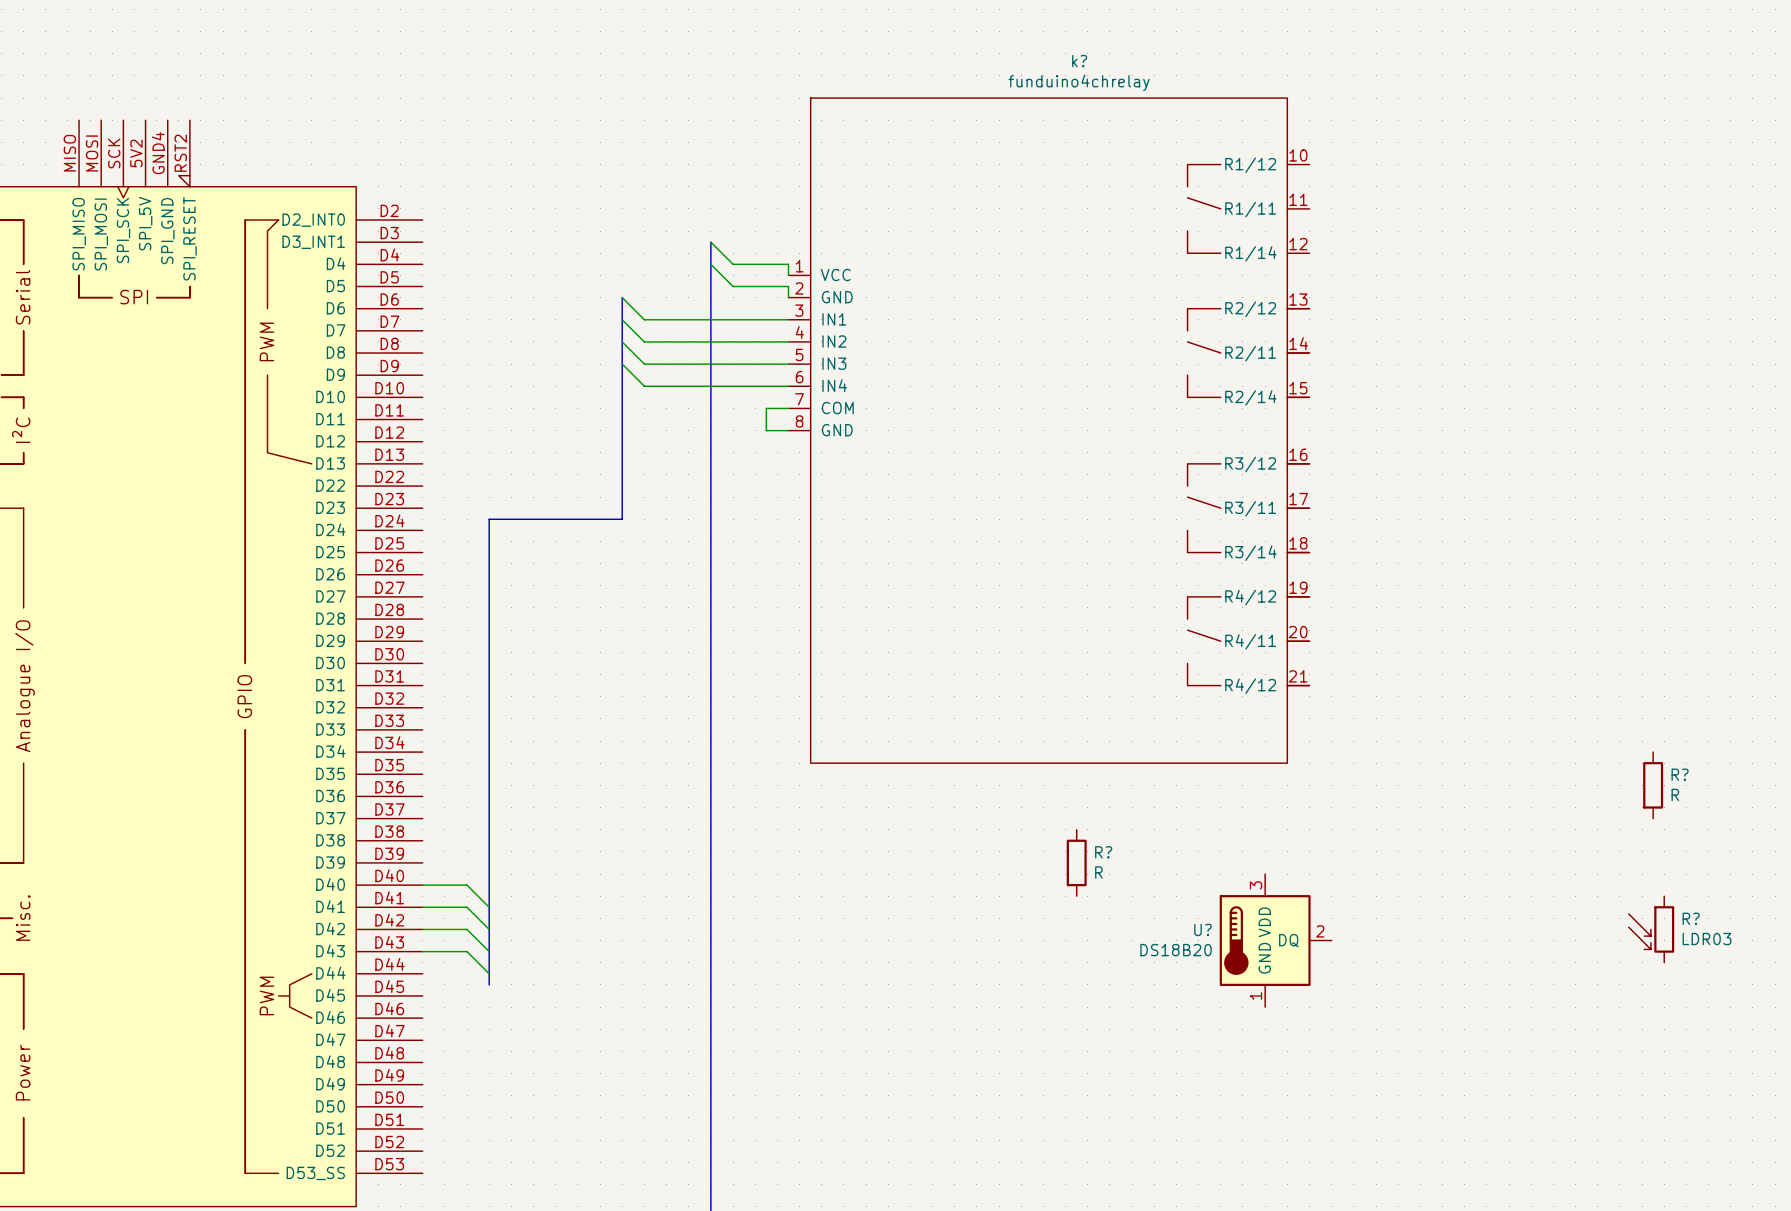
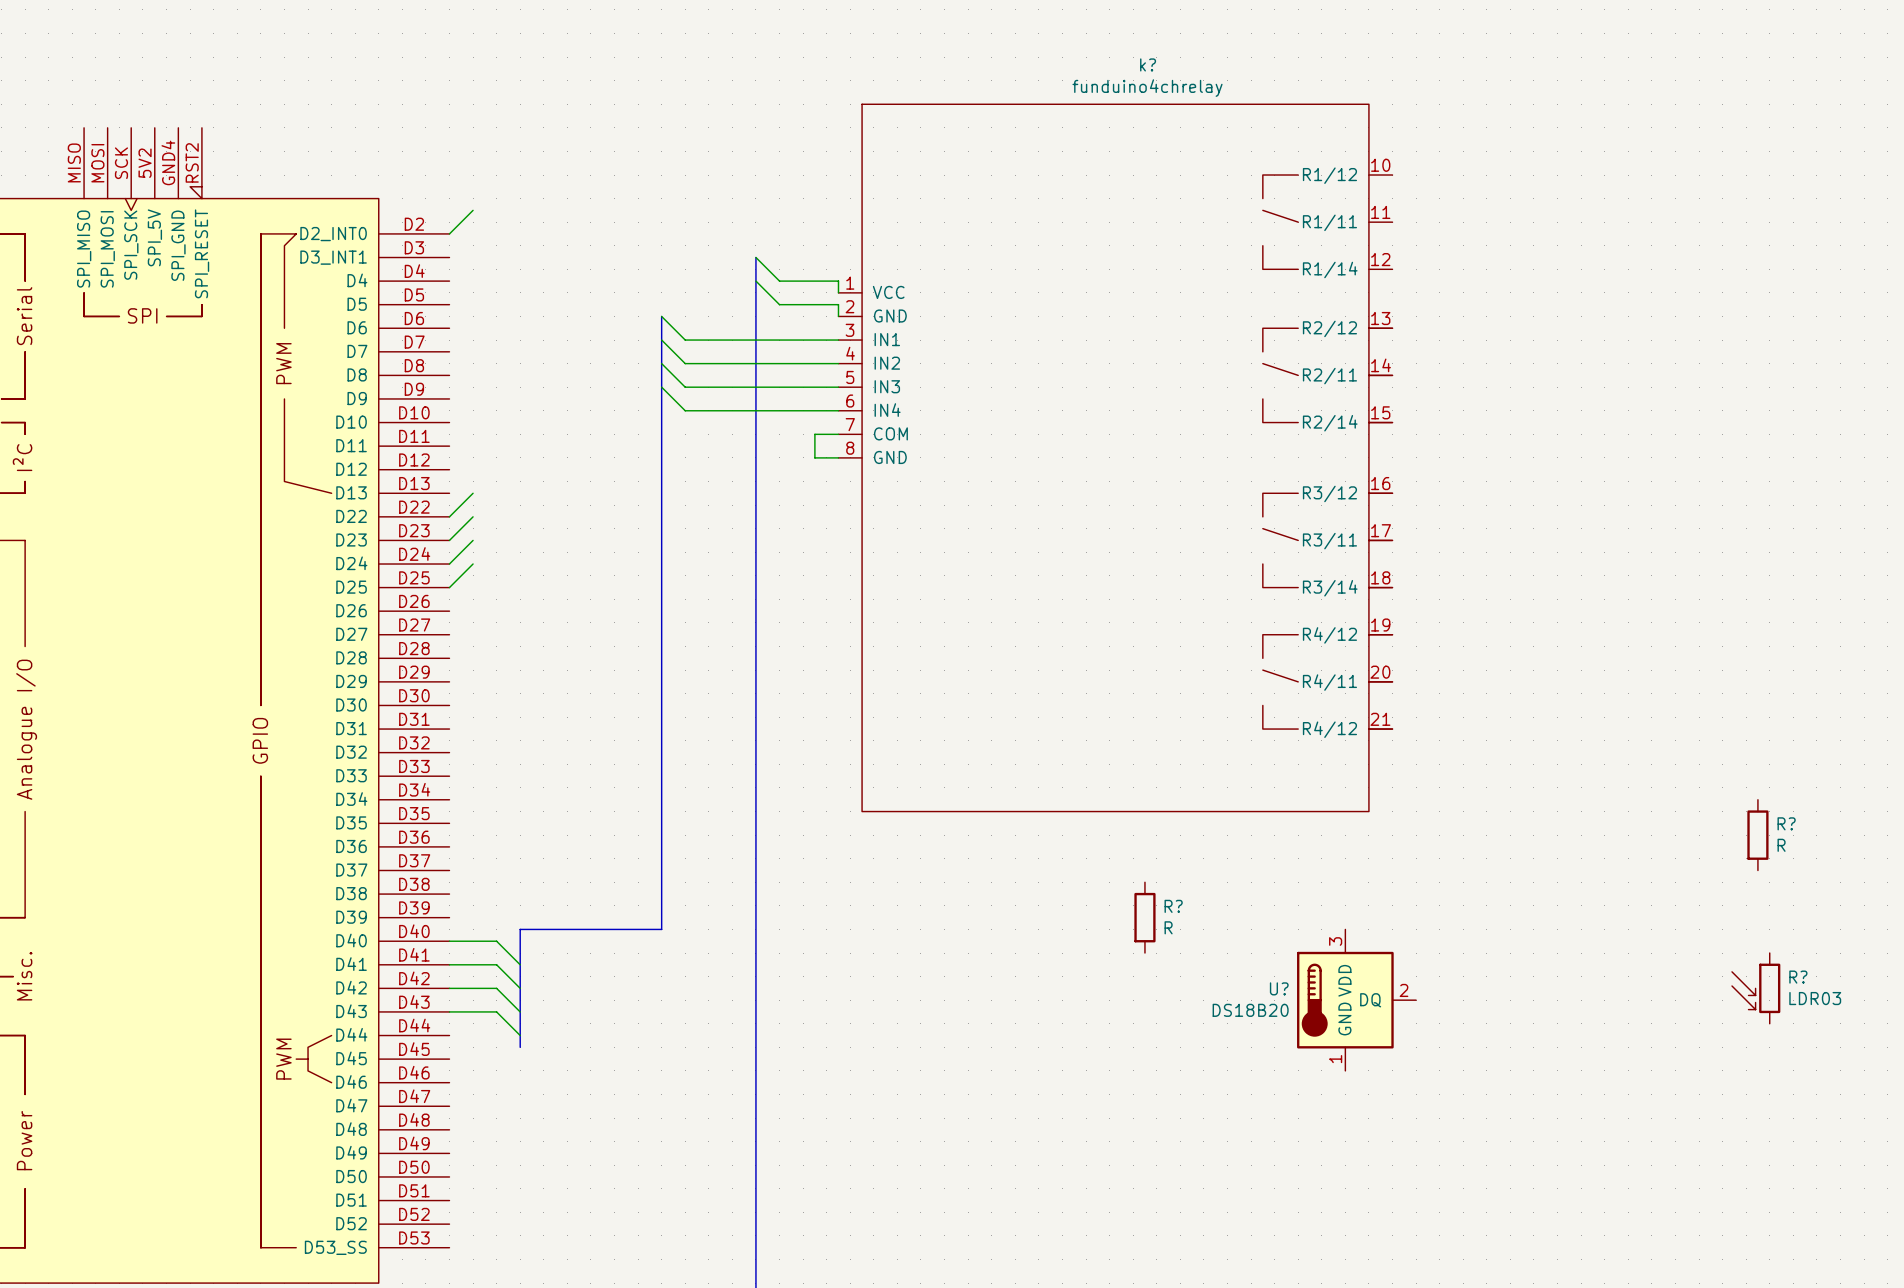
wire: none -> (473, 210) (449, 233)
wire: none -> (473, 493) (449, 516)
wire: none -> (473, 516) (449, 540)
wire: none -> (473, 540) (449, 564)
bus: (622, 519) (489, 519) (489, 874) -> (661, 552) (661, 929) (520, 929)
wire: none -> (473, 564) (449, 587)

